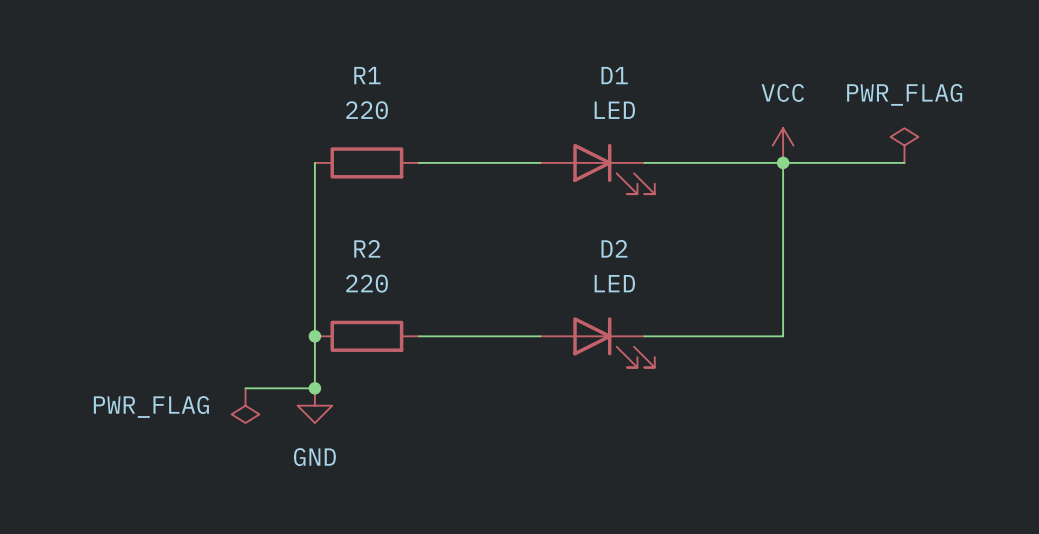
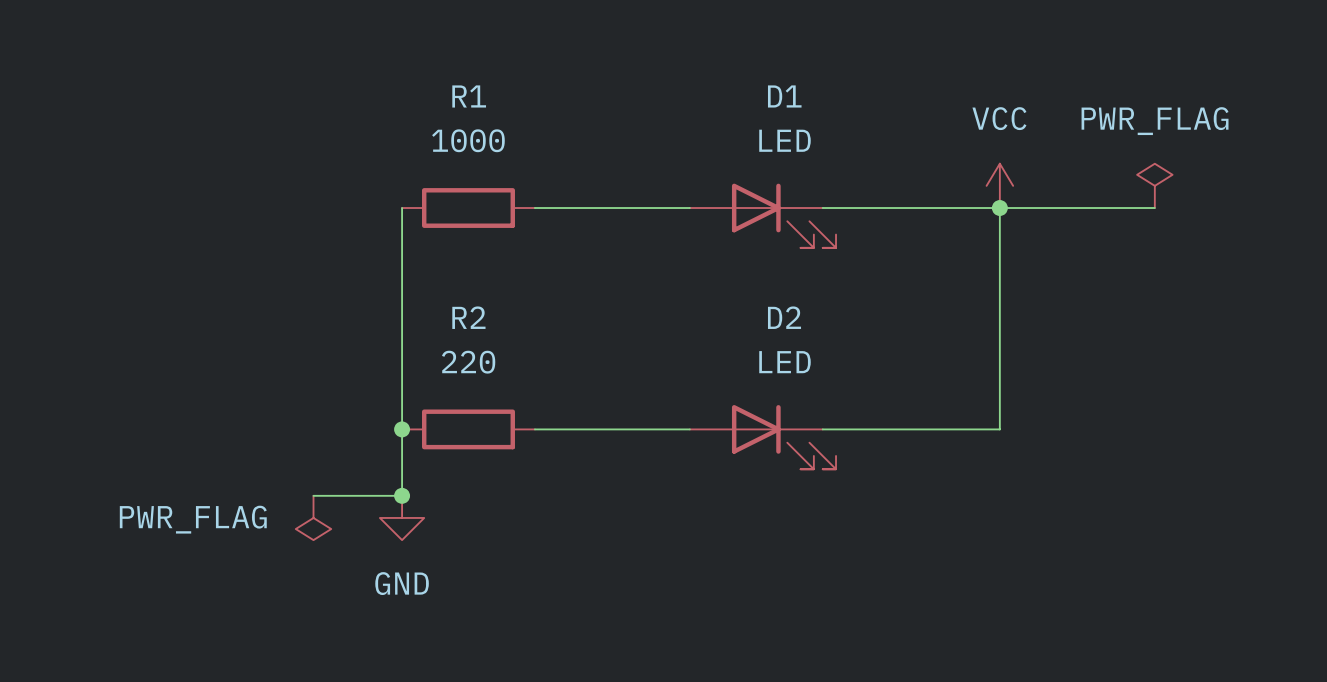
R1 value: 220 (367, 110) -> 1000 (468, 140)

